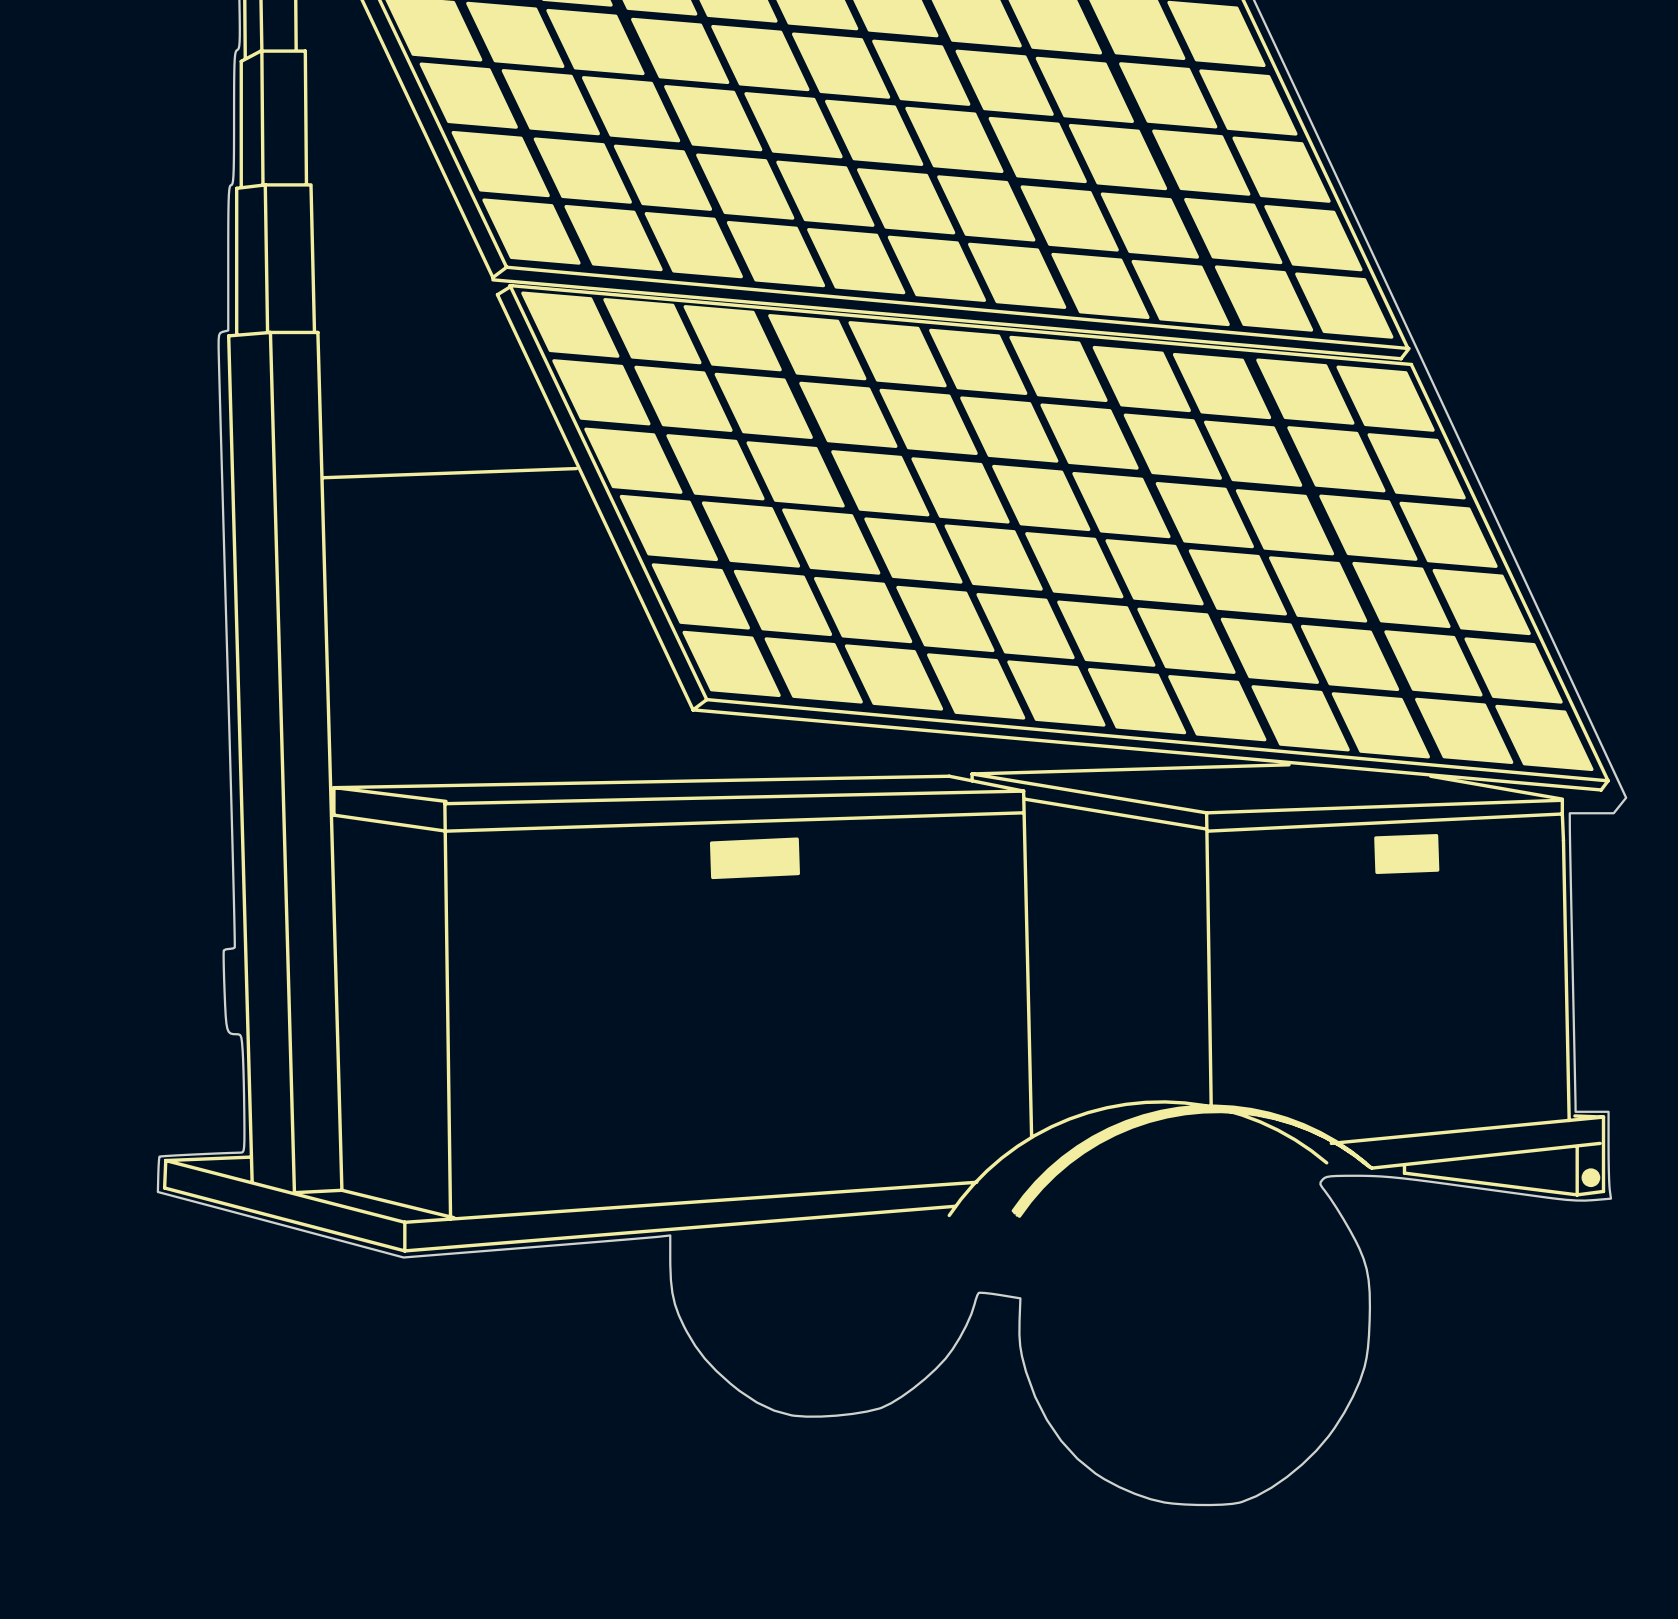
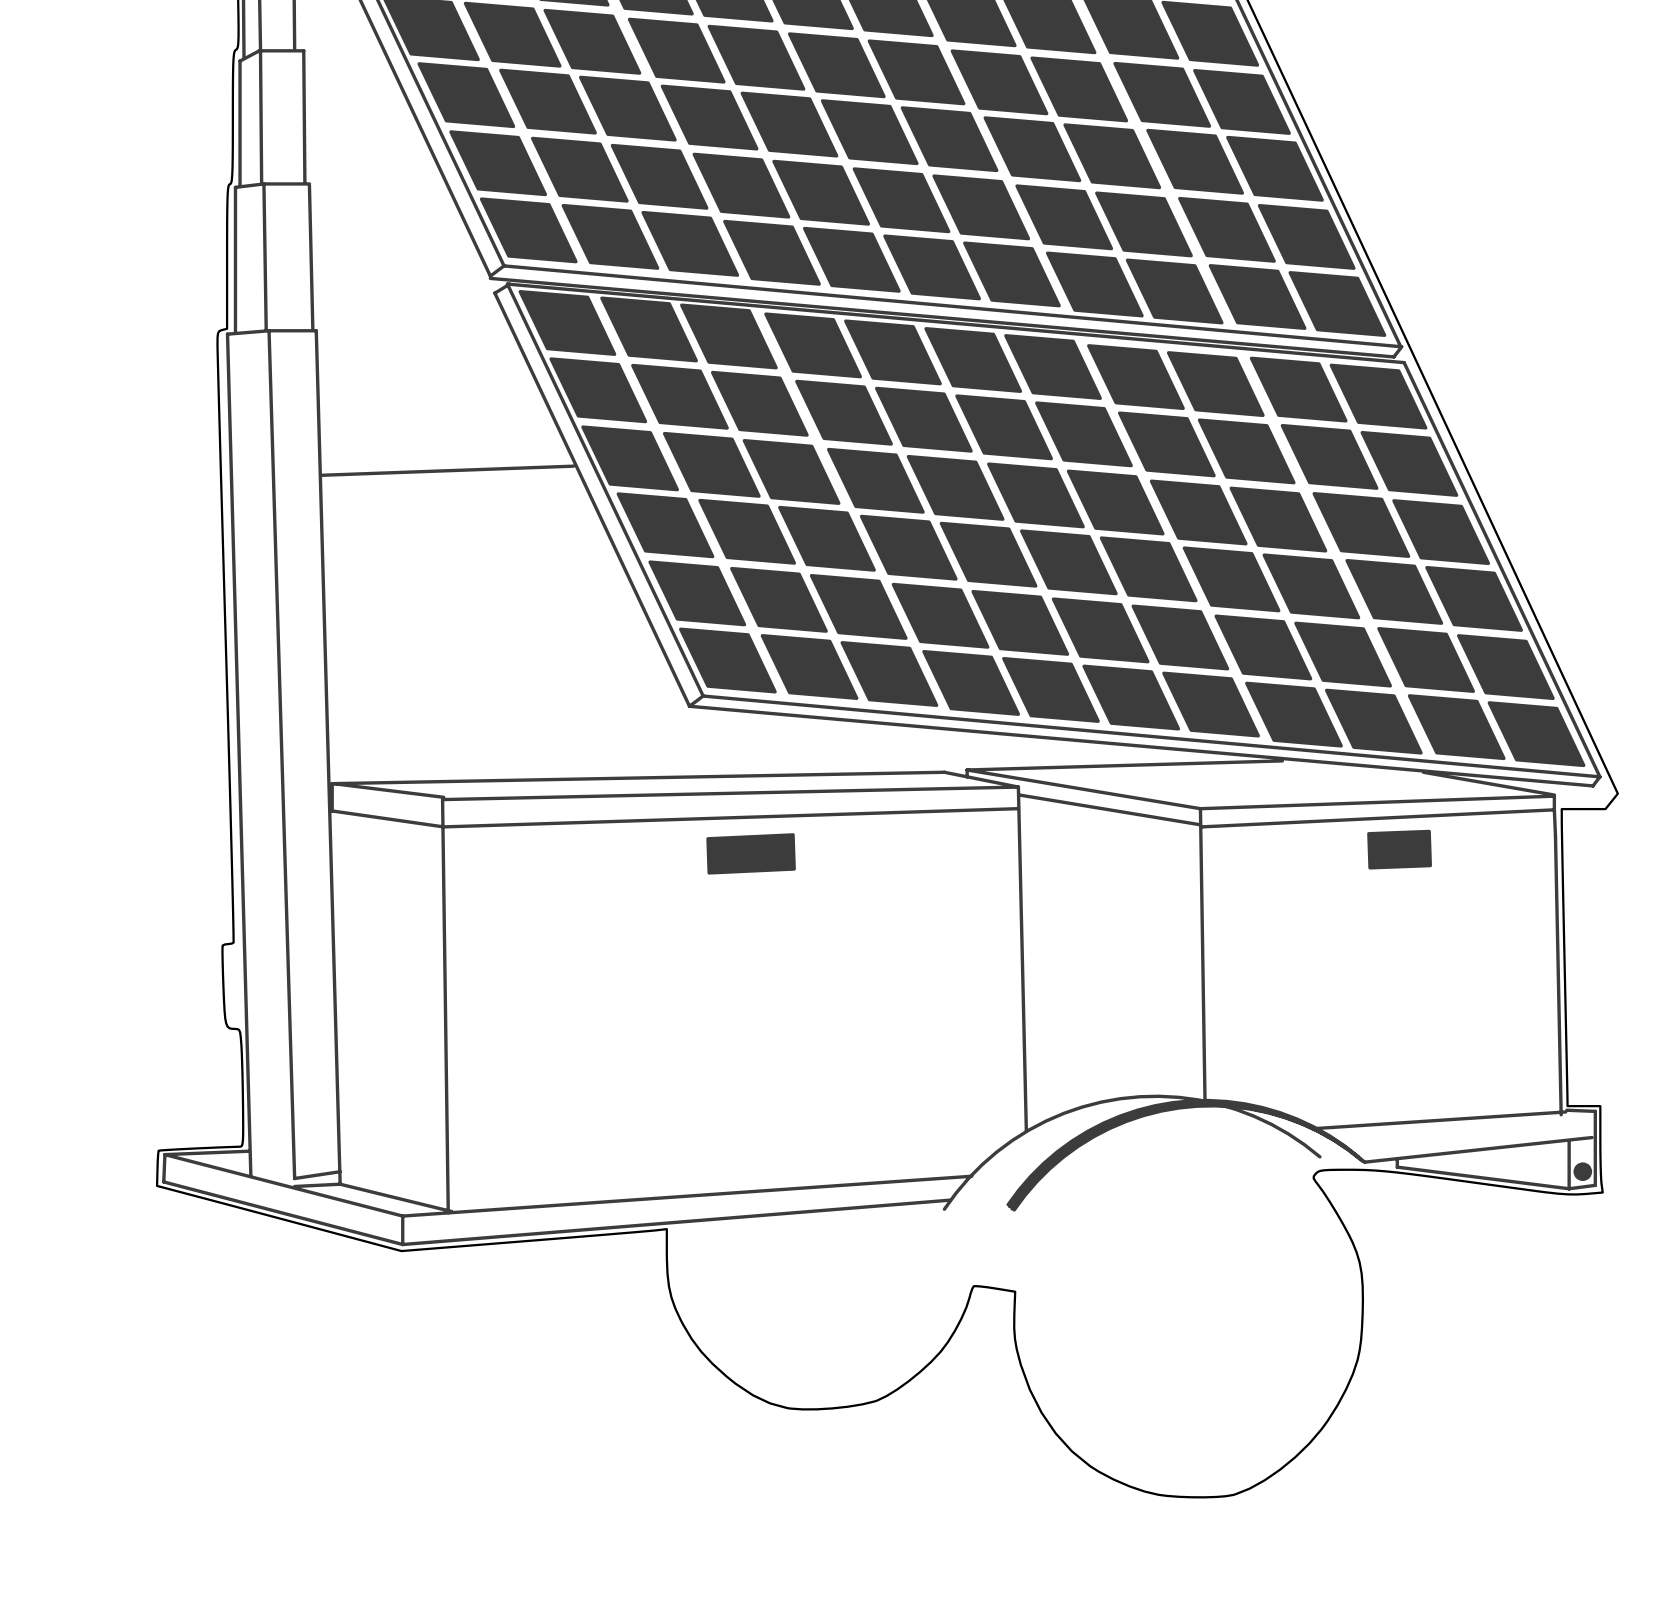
line: (270, 332) (294, 1192) -> (269, 330) (294, 1178) (340, 1171)
line: none -> (1565, 1111) (1317, 1128)
line: (1603, 1117) (1331, 1143) -> none

